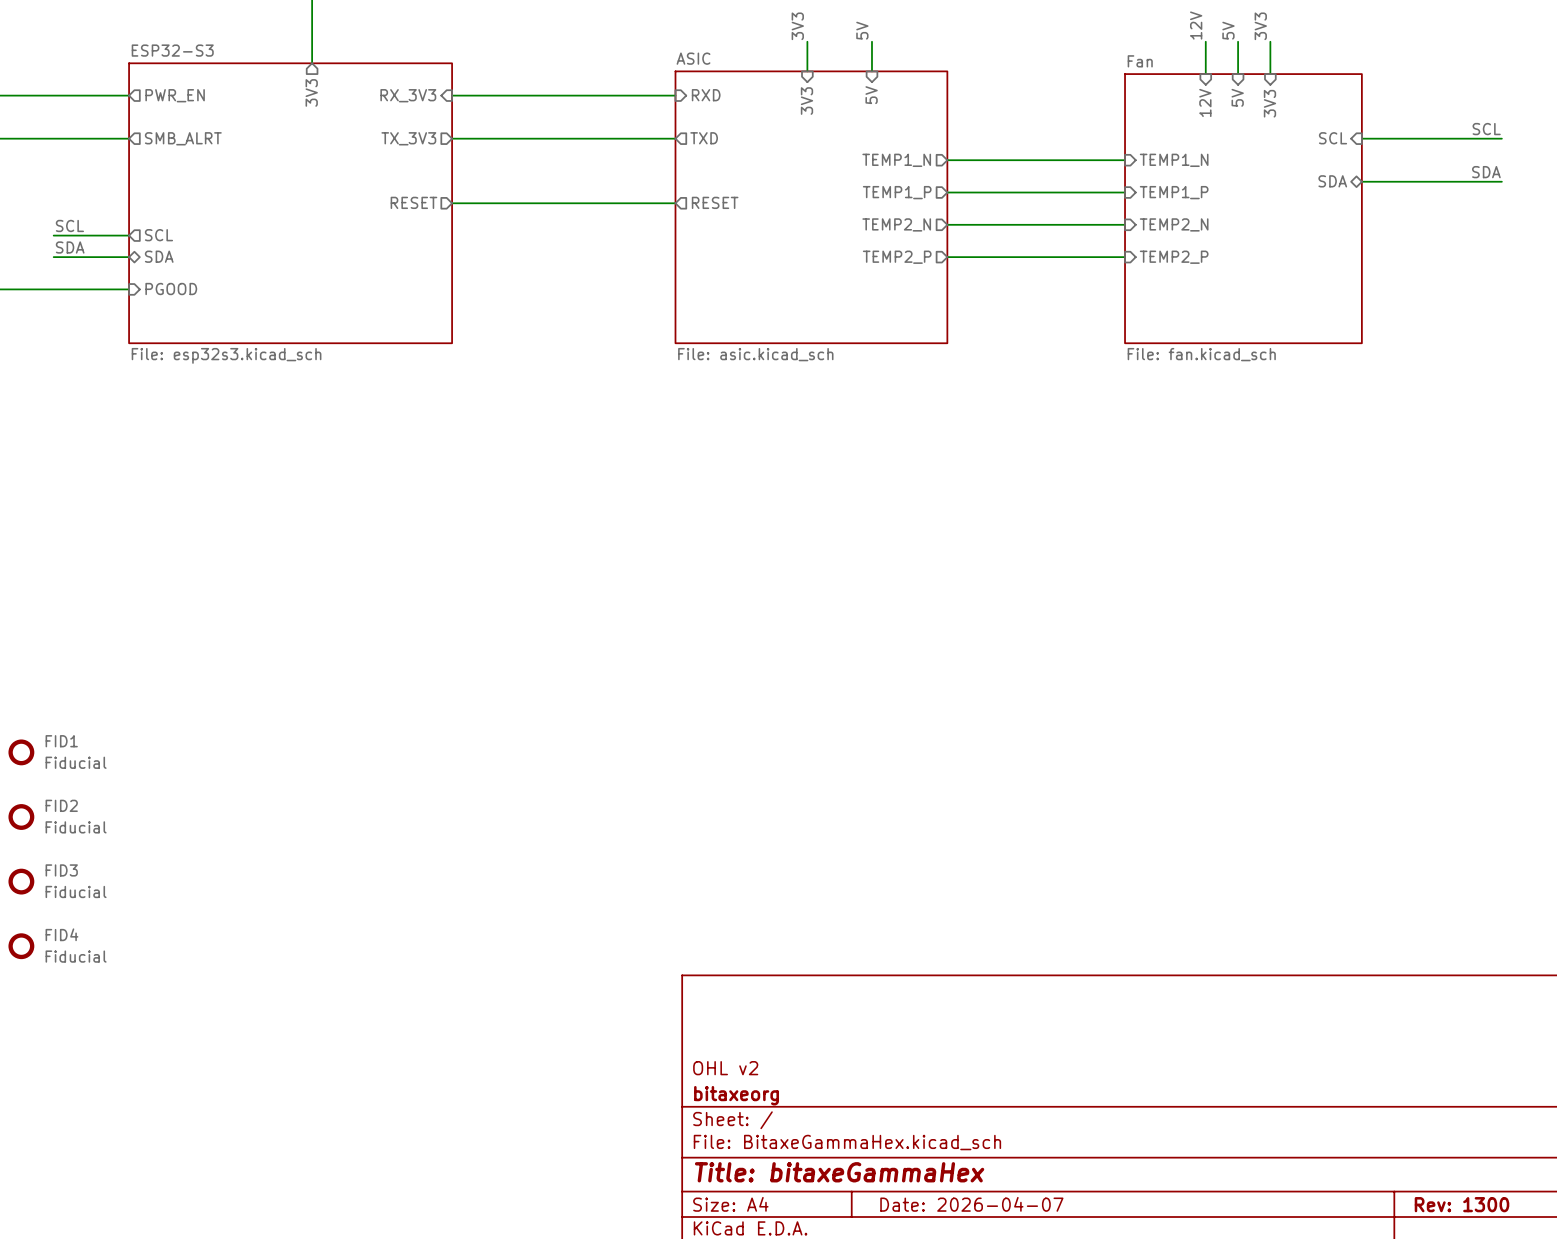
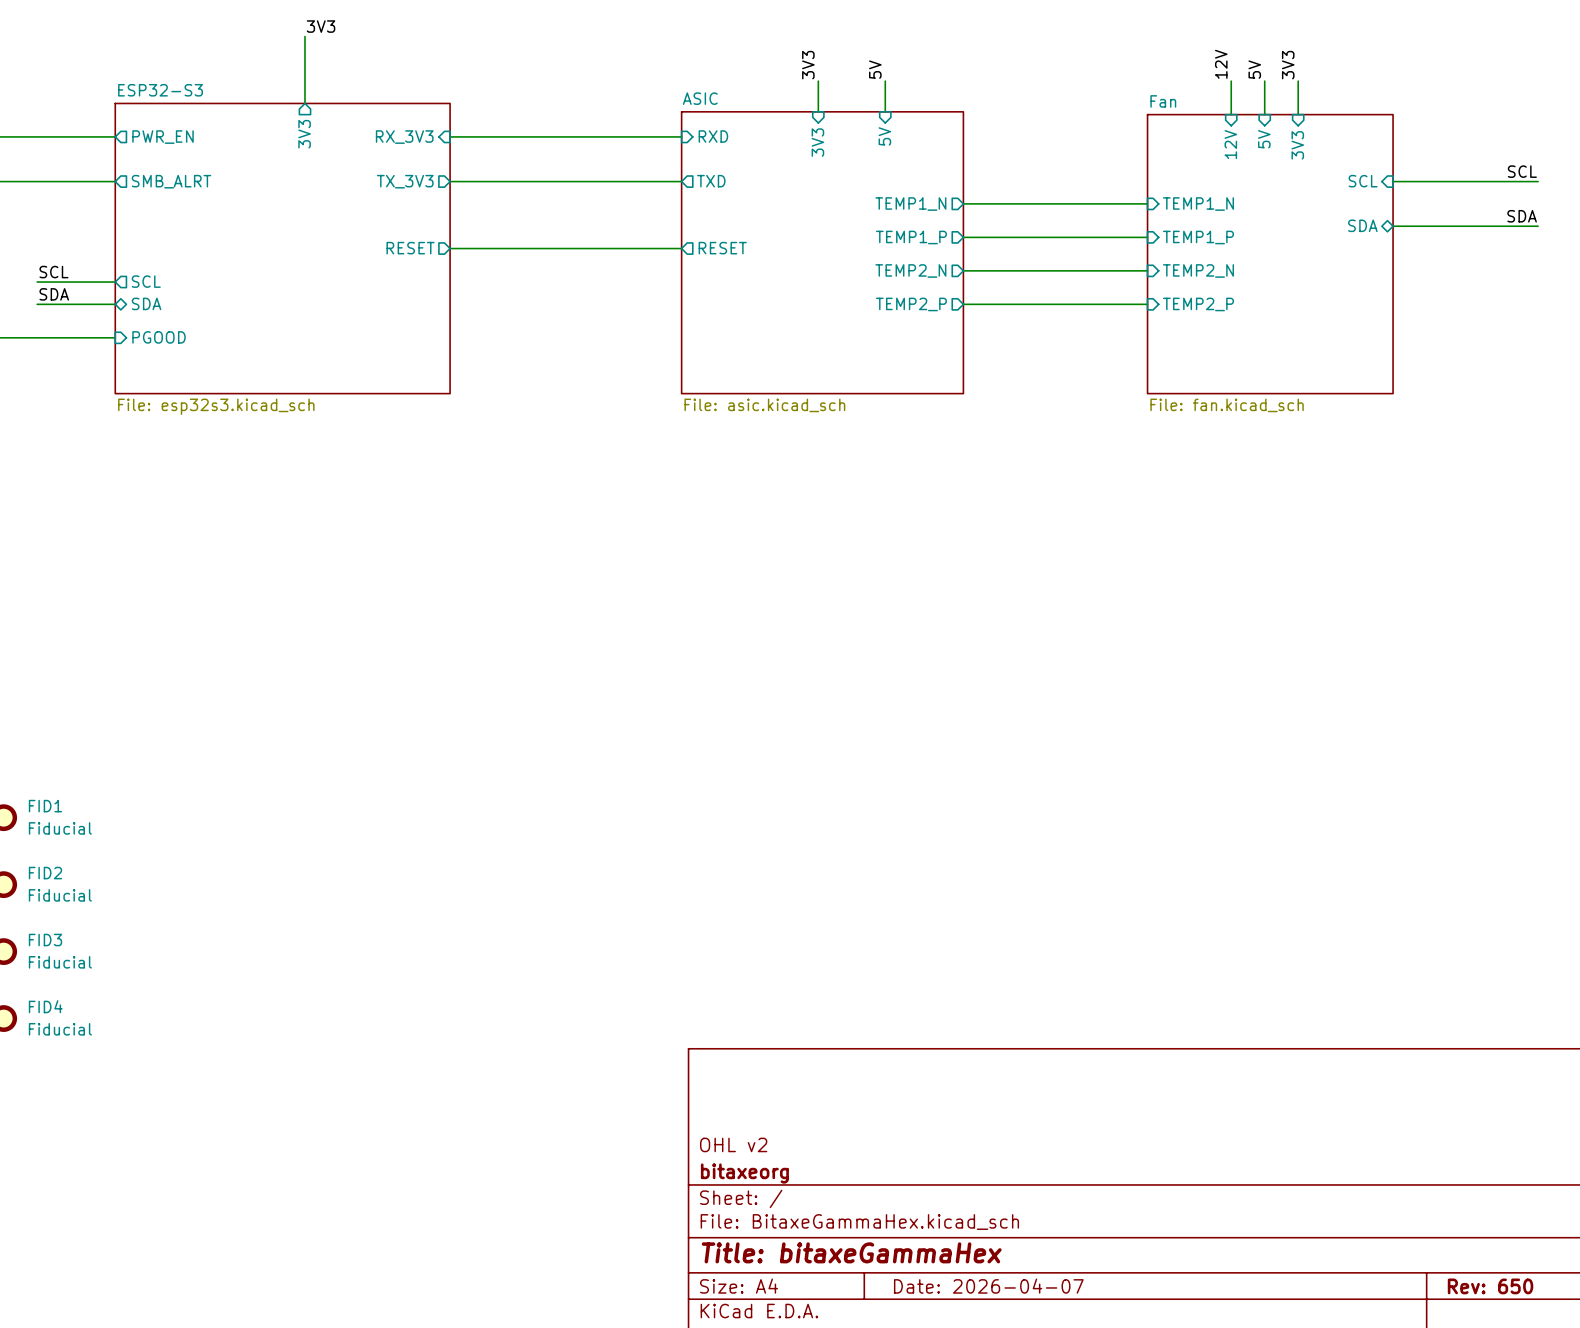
title block: Rev: 1300 (1462, 1204) -> Rev: 650 (1490, 1286)

